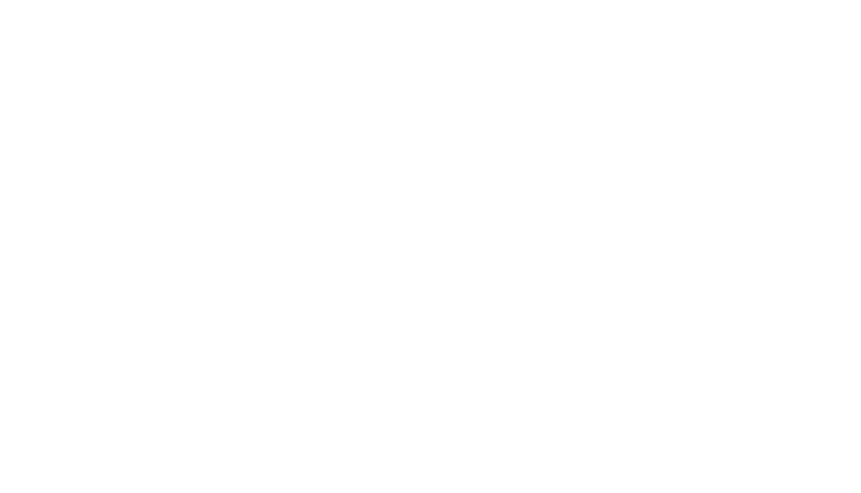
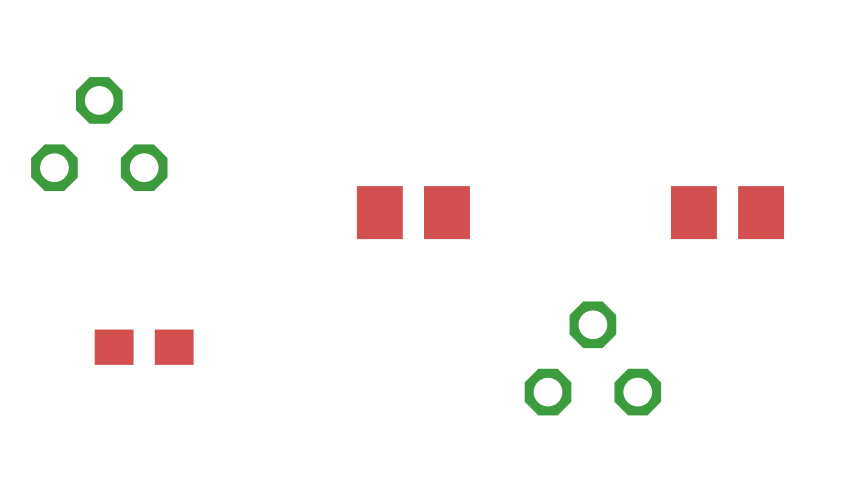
part: none -> (99, 134)
part: none -> (413, 212)
part: none -> (727, 212)
part: none -> (144, 347)
part: none -> (592, 358)

